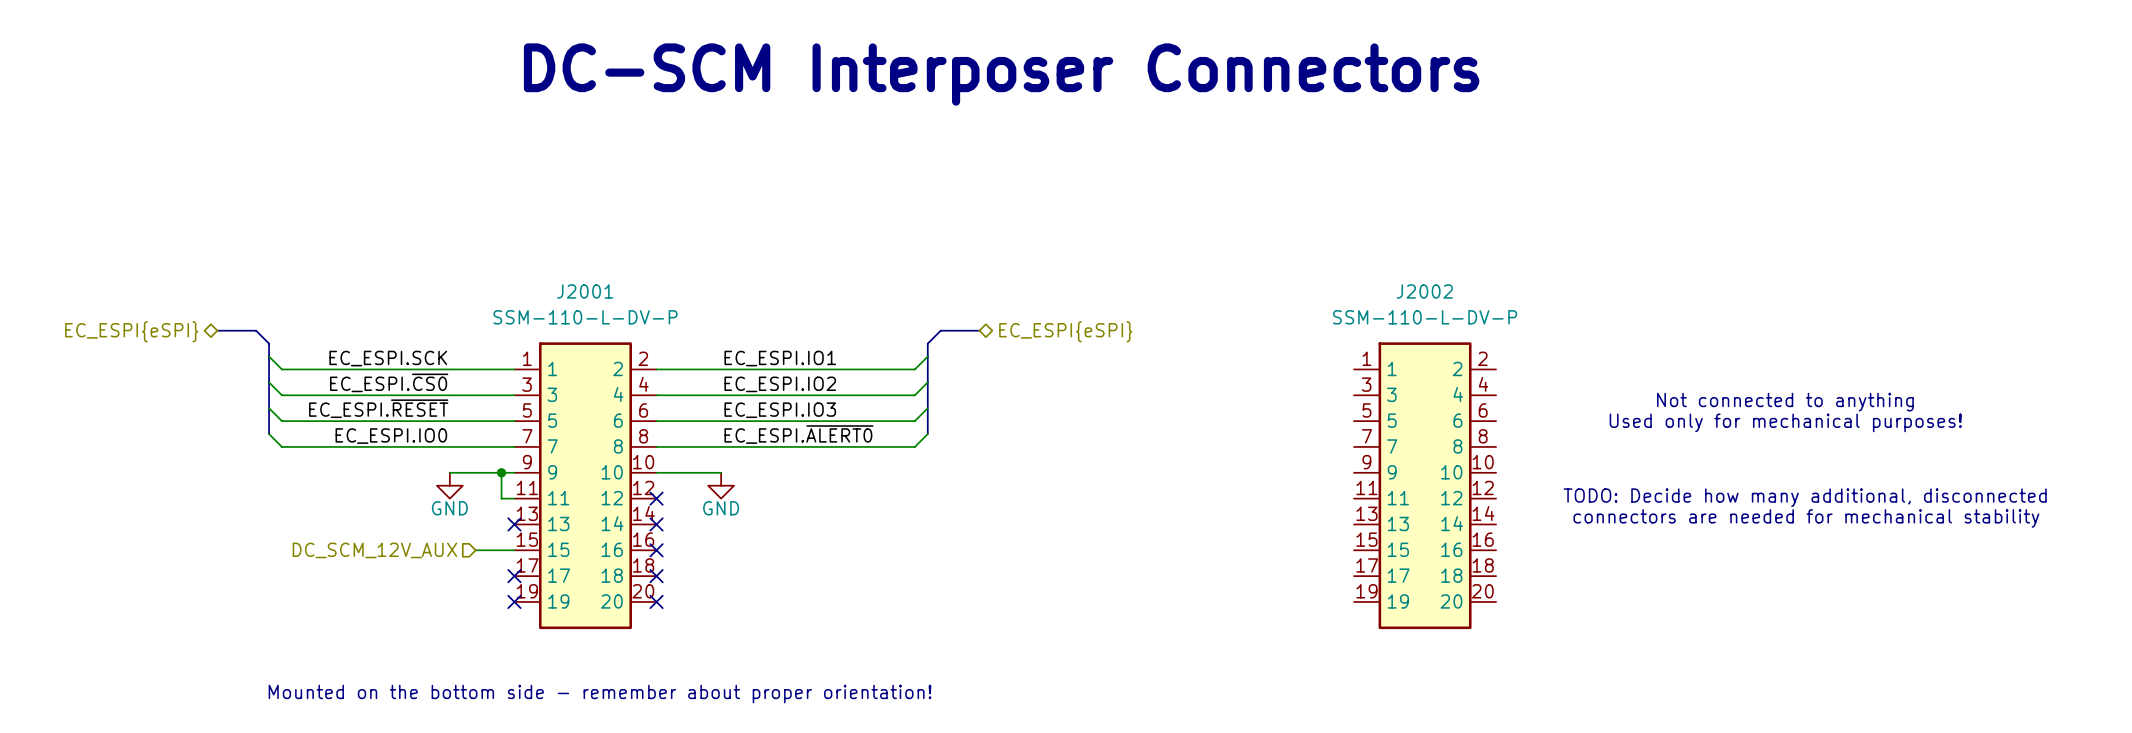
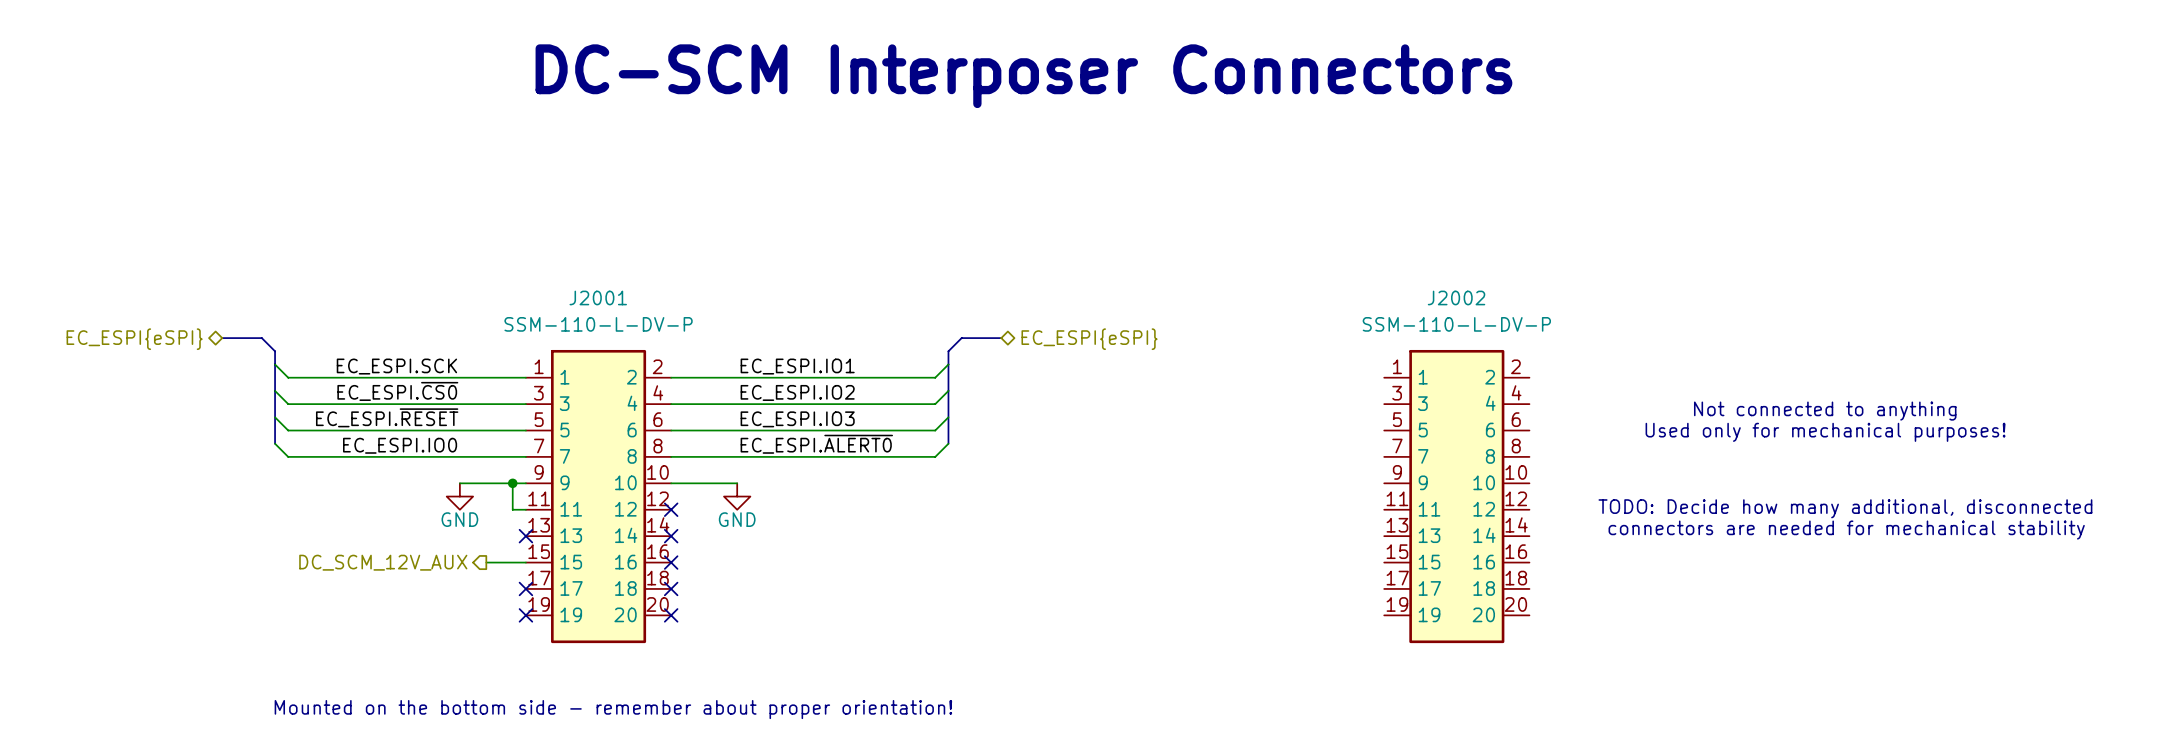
hierarchical label shape: input (374, 550) -> output (383, 562)

